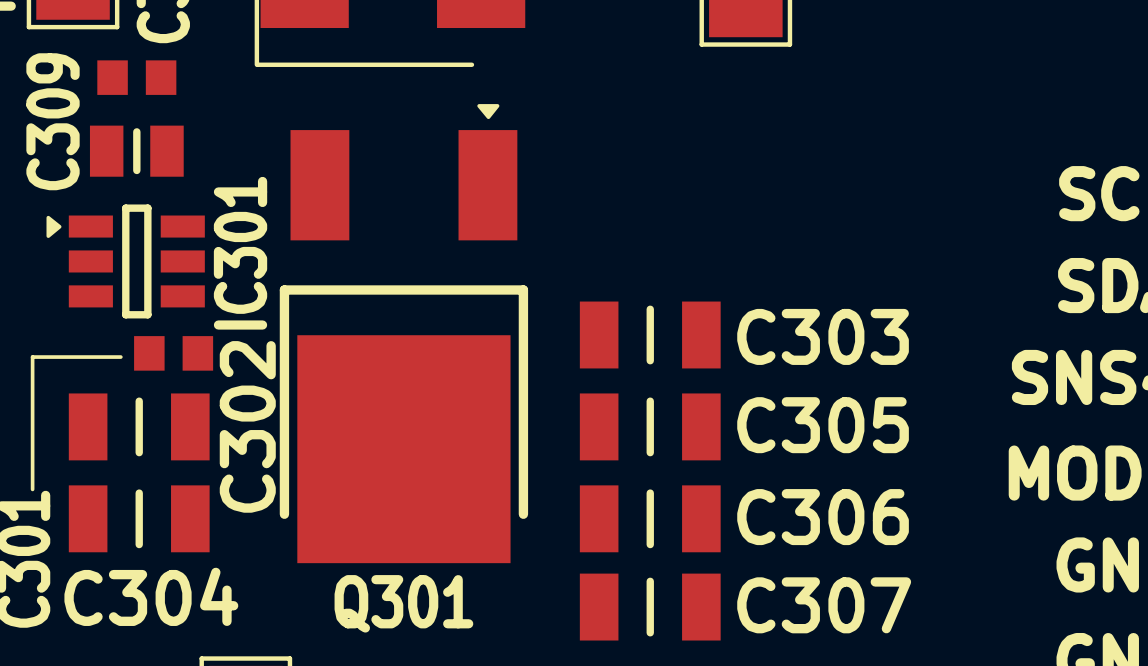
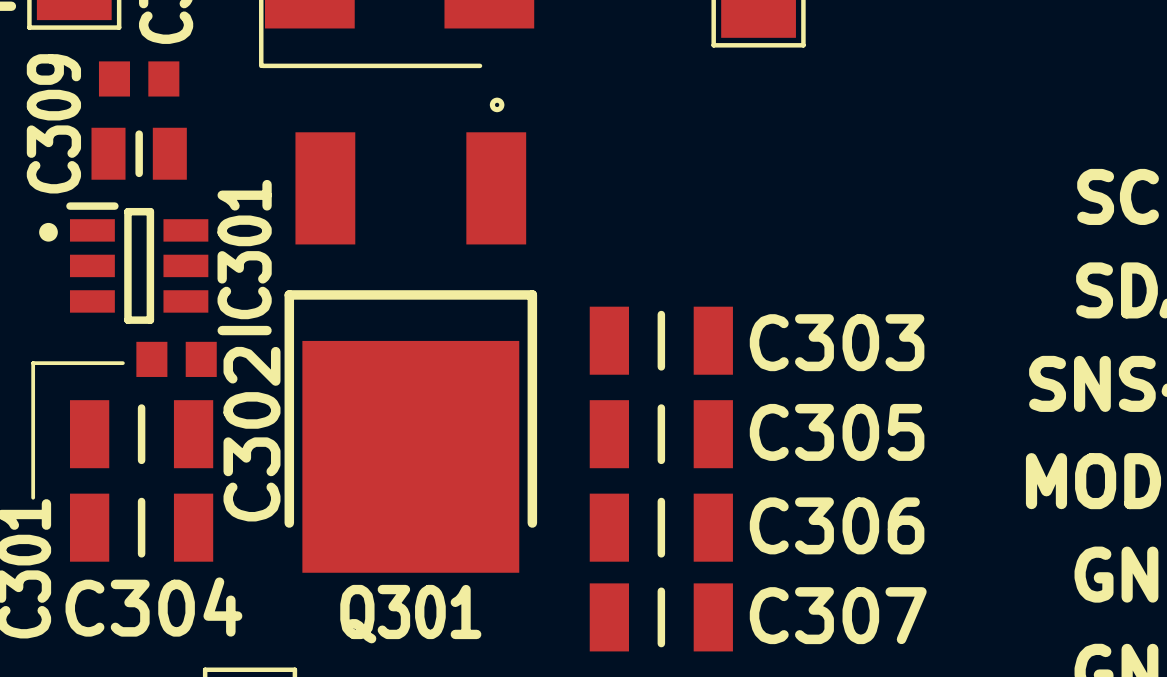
Q301 footprint: [279, 104, 529, 564] -> [284, 97, 538, 573]
IC301 footprint: [46, 204, 205, 319] -> [39, 202, 209, 324]

